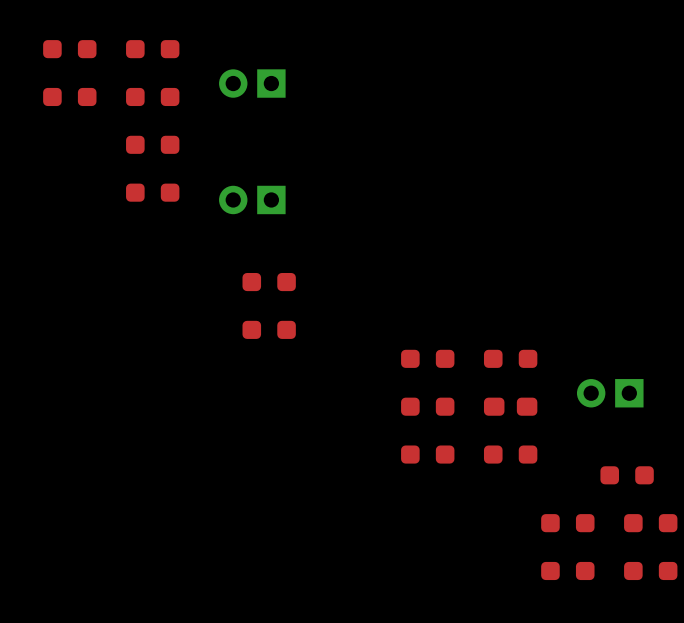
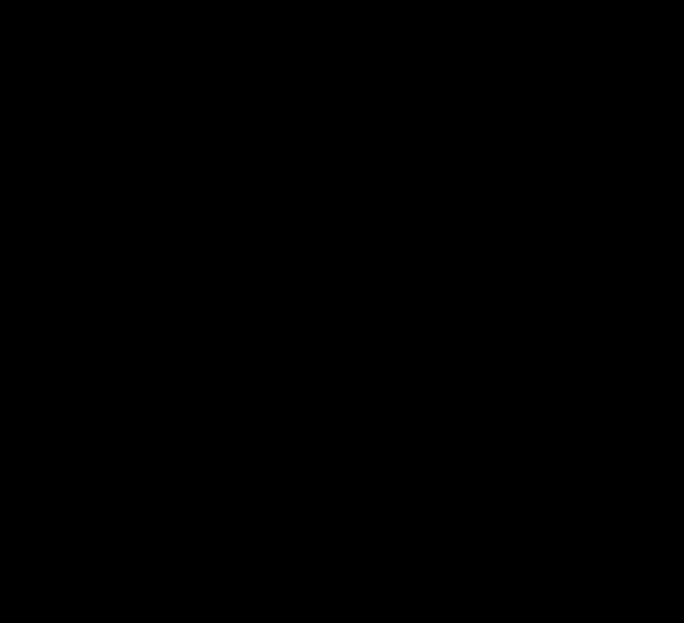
part: (69, 49) -> none
part: (152, 49) -> none
part: (252, 83) -> none
part: (69, 96) -> none
part: (152, 96) -> none
part: (152, 144) -> none
part: (152, 192) -> none
part: (252, 199) -> none
part: (269, 282) -> none
part: (269, 329) -> none
part: (427, 358) -> none
part: (510, 358) -> none
part: (610, 393) -> none
part: (427, 406) -> none
part: (510, 406) -> none
part: (427, 454) -> none
part: (510, 454) -> none
part: (627, 475) -> none
part: (567, 523) -> none
part: (650, 523) -> none
part: (567, 570) -> none
part: (650, 570) -> none

